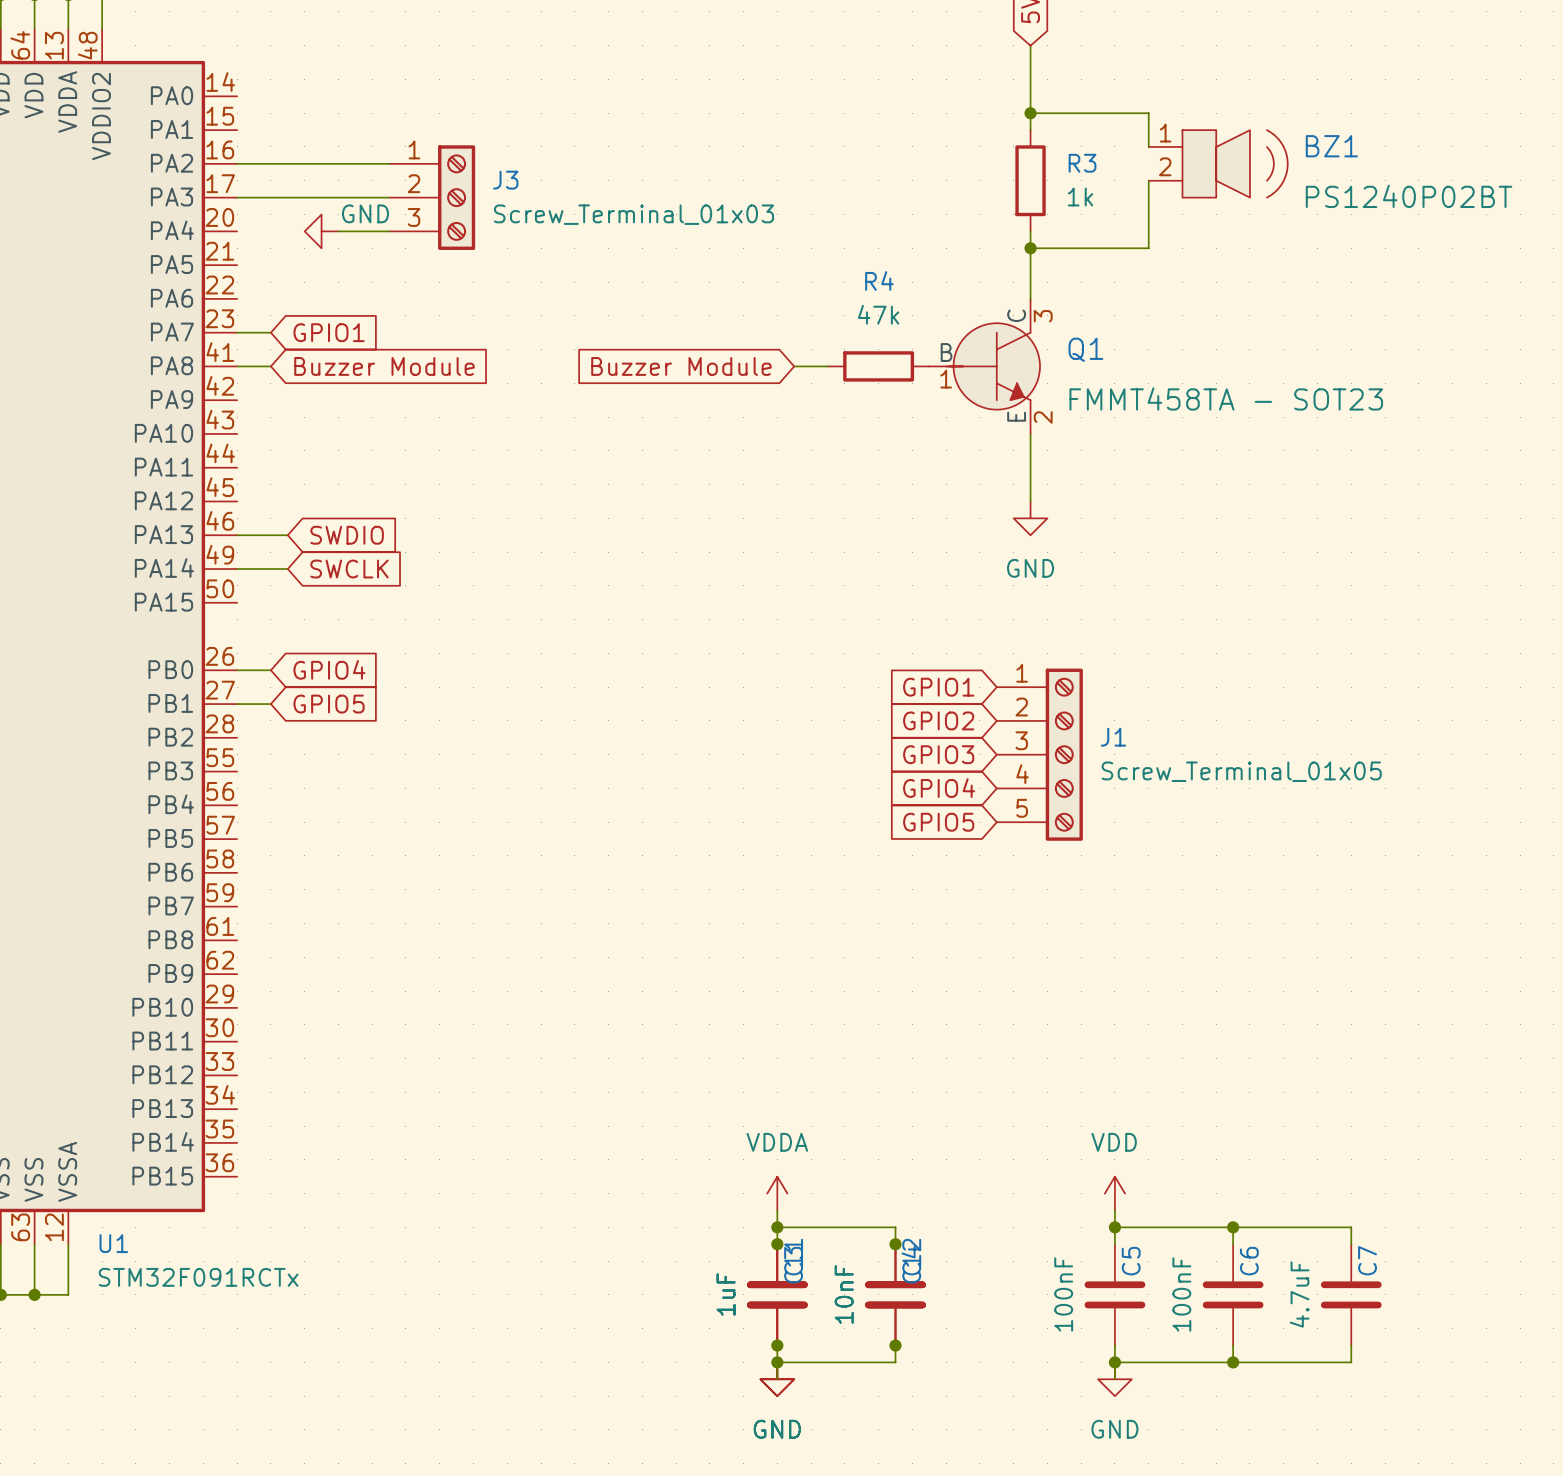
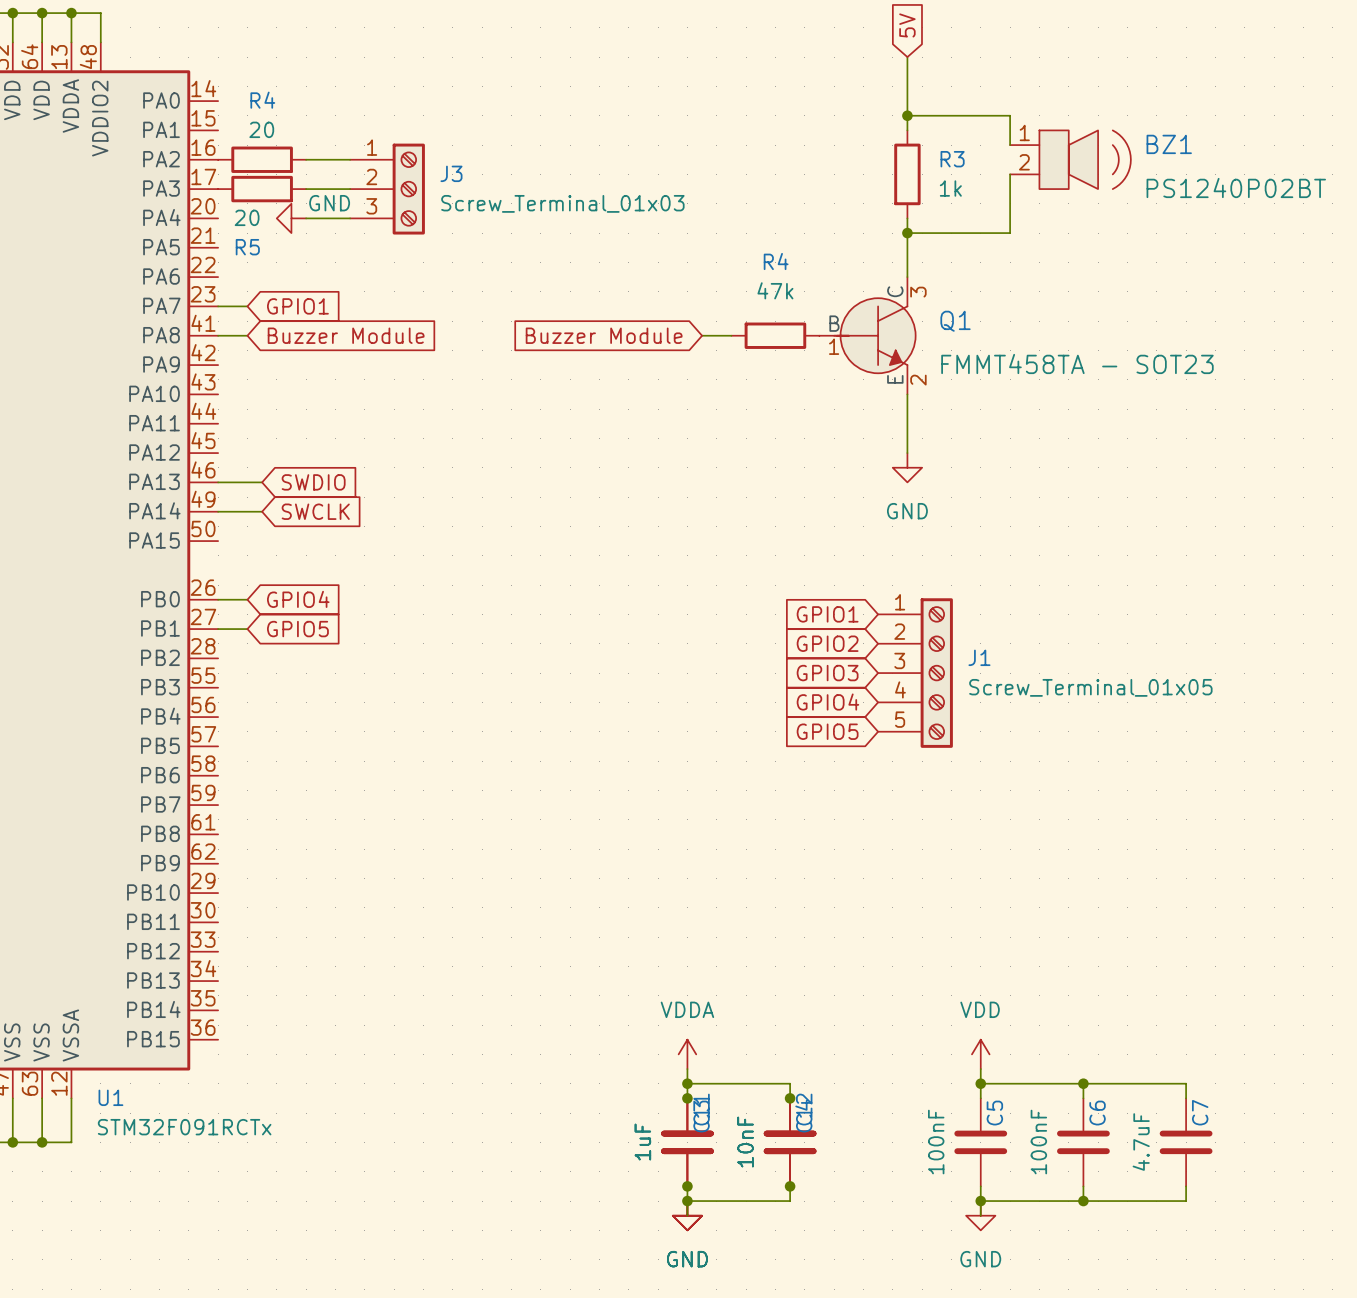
wire: (237, 163) (338, 163) -> none
R4: none -> 20 (262, 159)
wire: (237, 197) (338, 197) -> none
R5: none -> 20 (262, 189)

